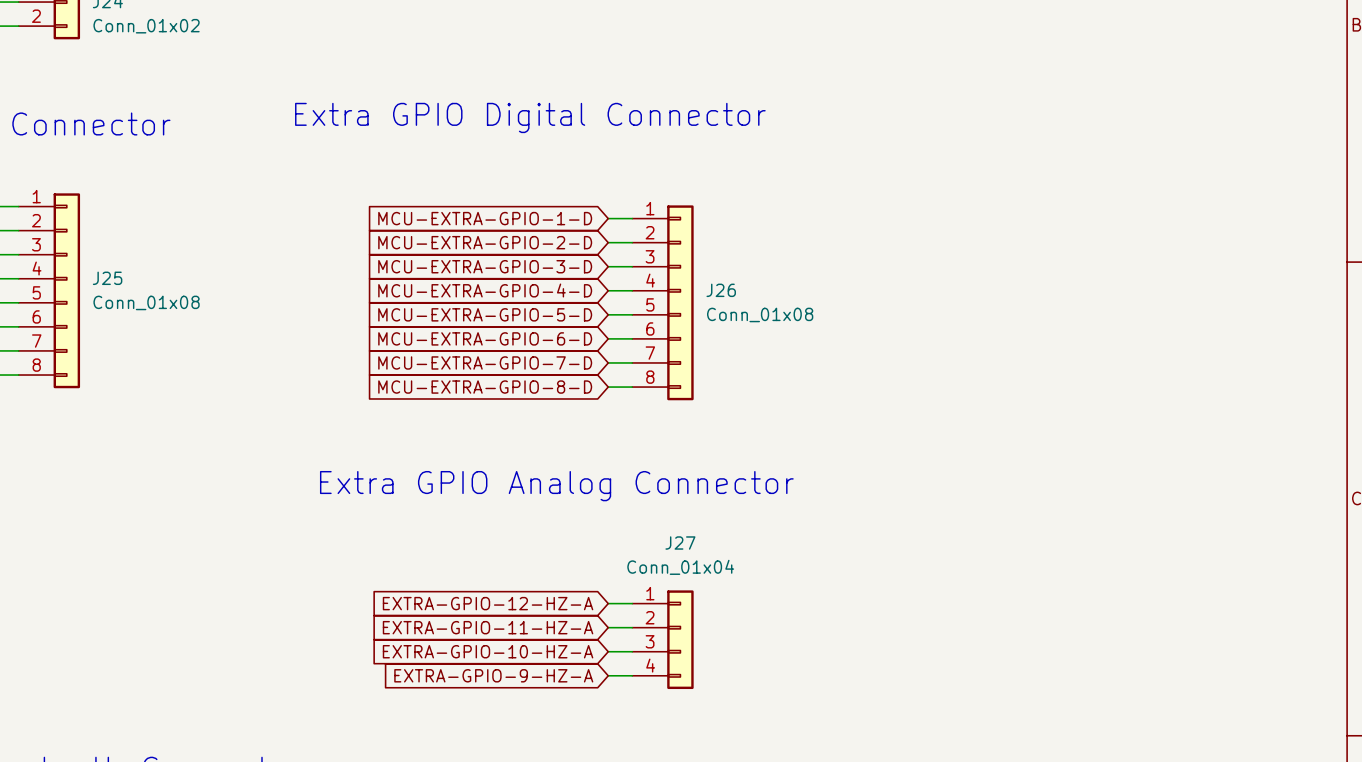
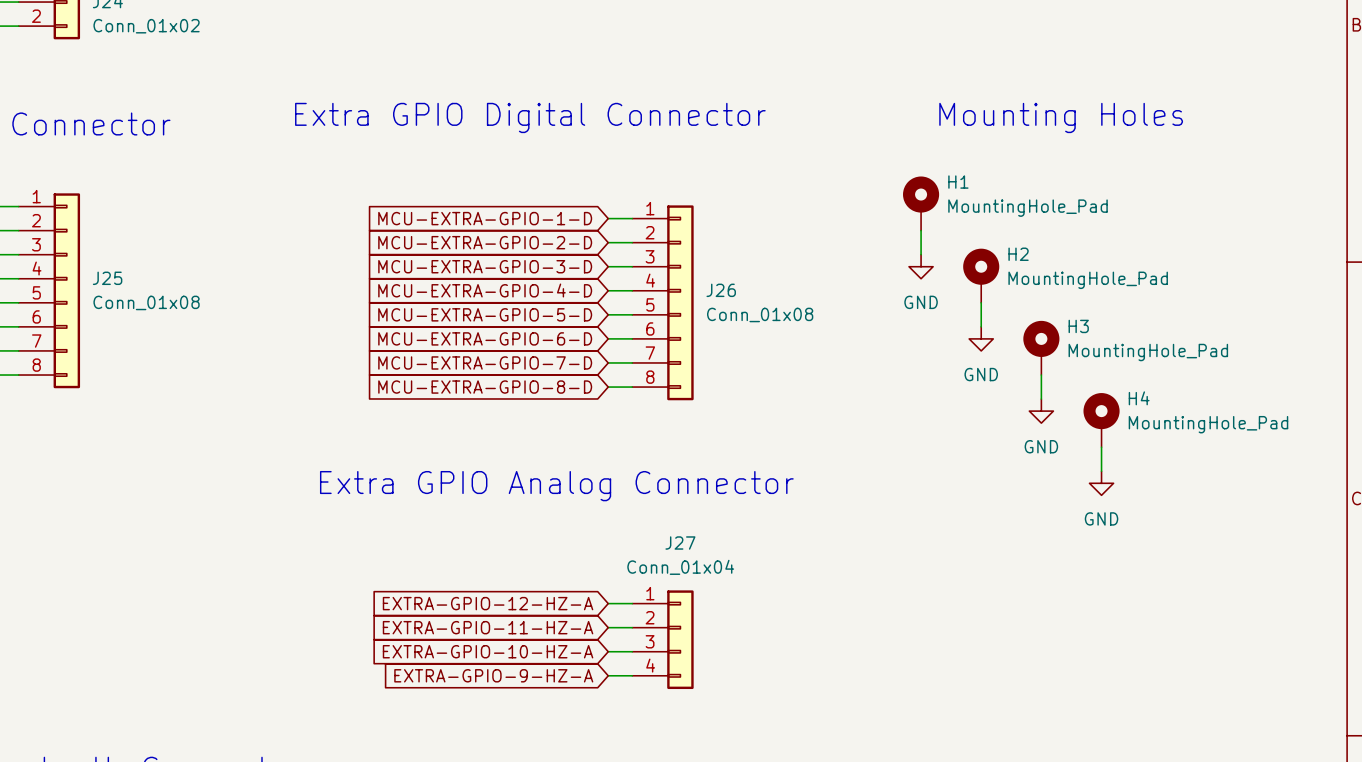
text: none -> Mounting Holes (1061, 117)
H1: none -> MountingHole_Pad (921, 203)
wire: none -> (921, 230) (921, 254)
power symbol: none -> GND (921, 266)
H2: none -> MountingHole_Pad (981, 275)
wire: none -> (981, 302) (981, 326)
power symbol: none -> GND (981, 338)
H3: none -> MountingHole_Pad (1041, 347)
wire: none -> (1041, 375) (1041, 399)
power symbol: none -> GND (1041, 411)
H4: none -> MountingHole_Pad (1101, 420)
wire: none -> (1101, 447) (1101, 471)
power symbol: none -> GND (1101, 483)

